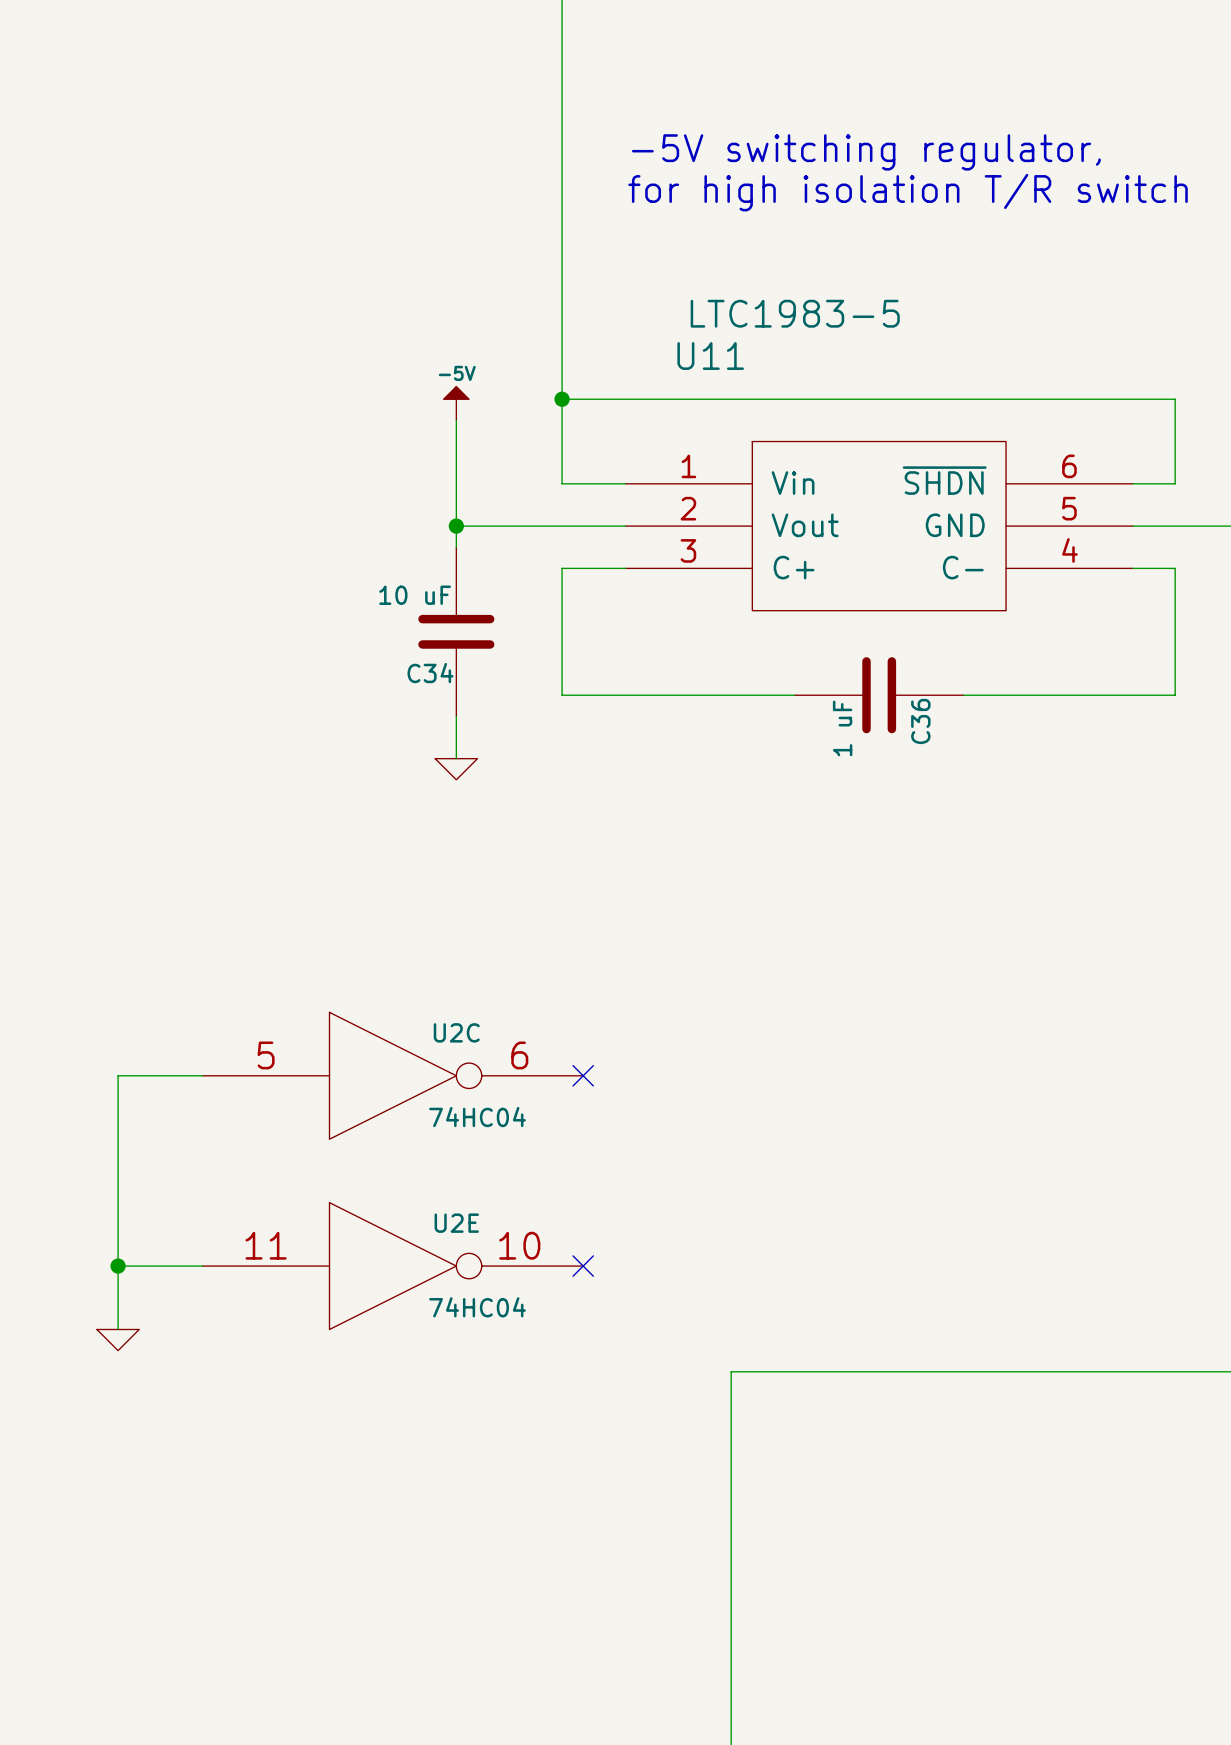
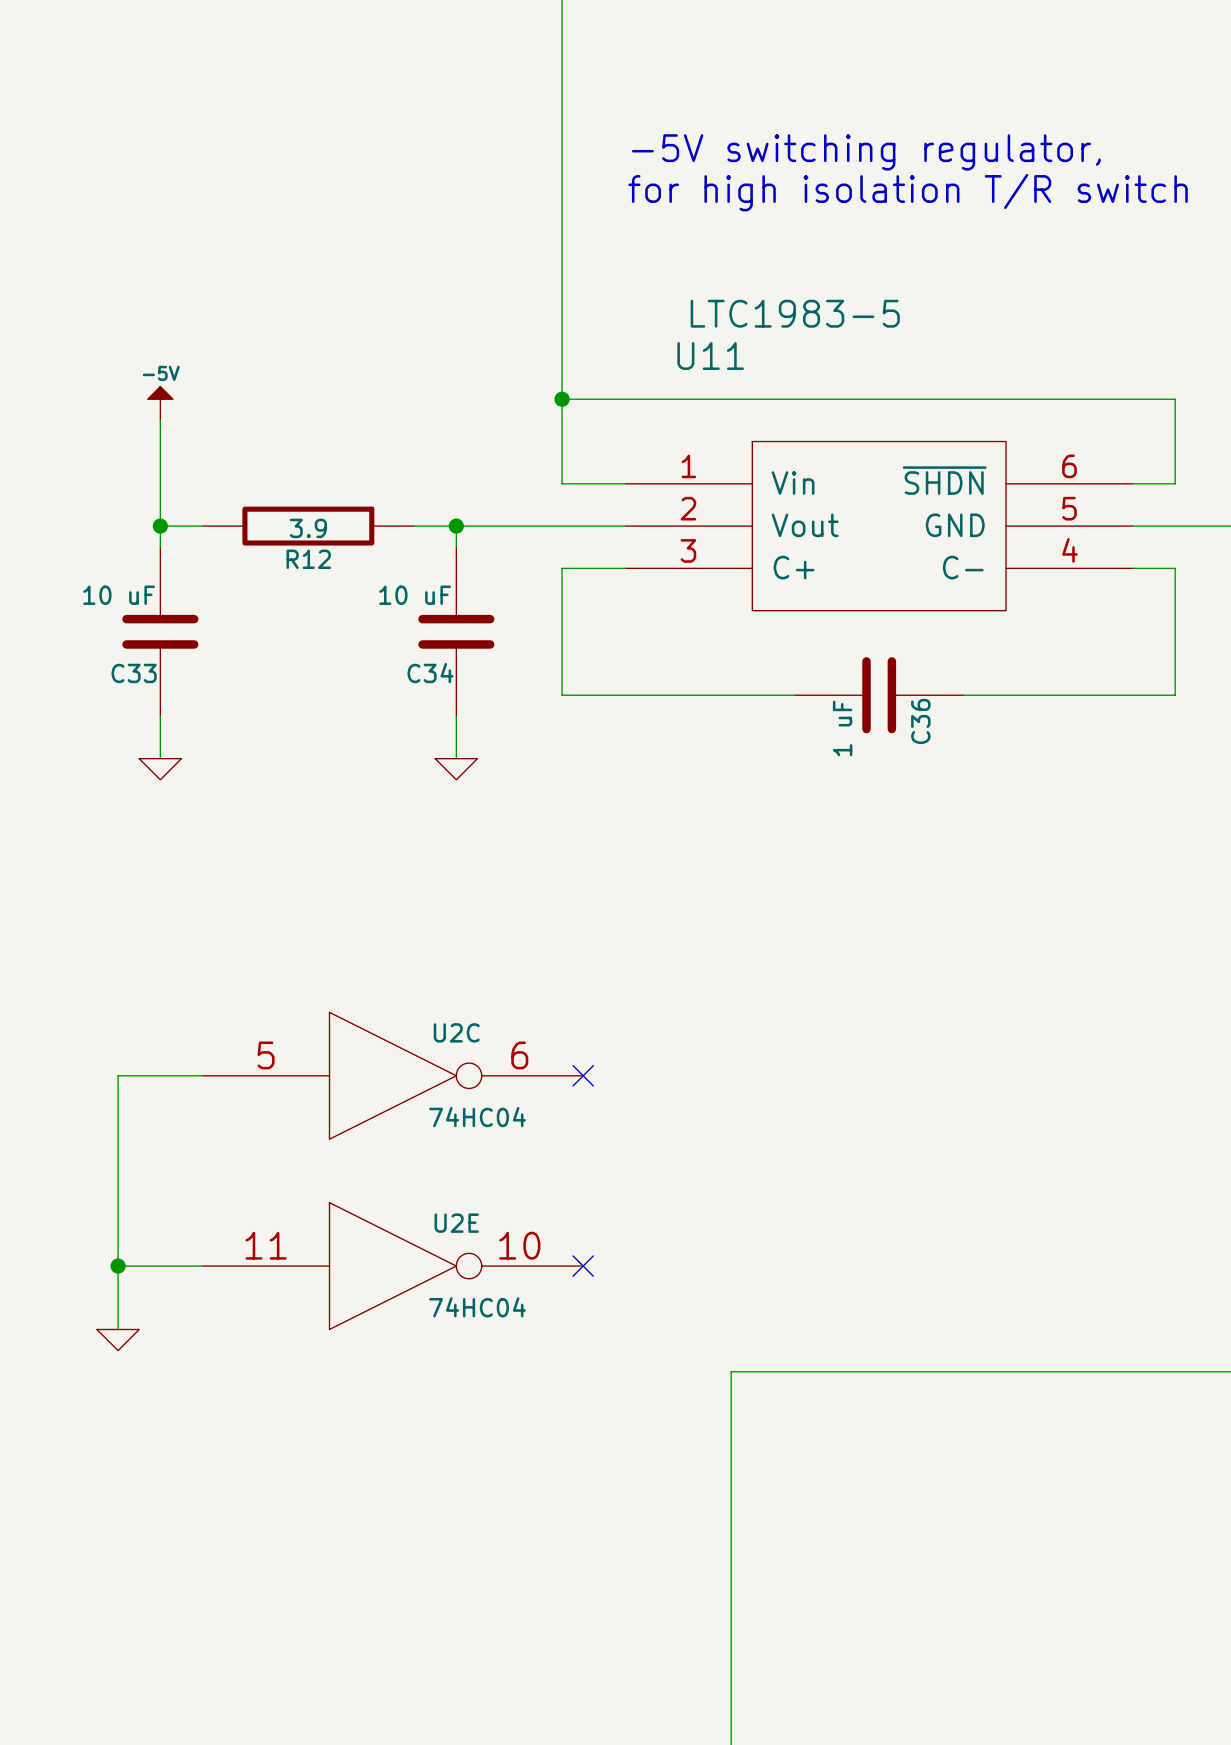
power symbol position: -5V (456, 403) -> -5V (160, 403)
wire: none -> (160, 420) (160, 547)
wire: (456, 420) (456, 526) -> (414, 526) (456, 526)
wire: none -> (160, 526) (202, 526)
junction: none -> (160, 526)
R12: none -> 3.9 (308, 526)
C33: none -> 10 uF (160, 631)
wire: none -> (160, 716) (160, 758)
power symbol: none -> (160, 769)

